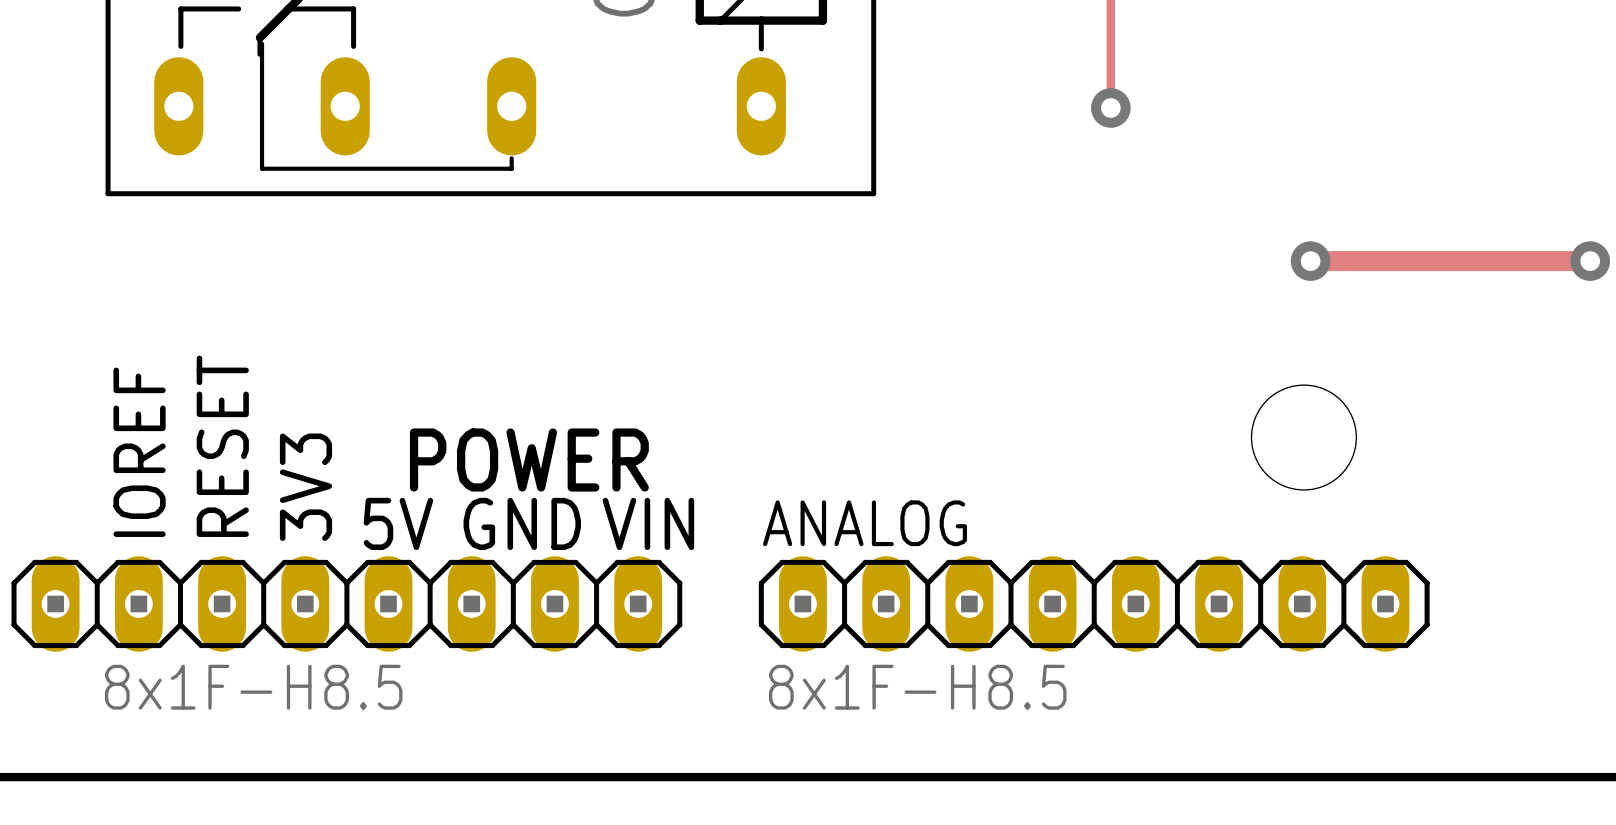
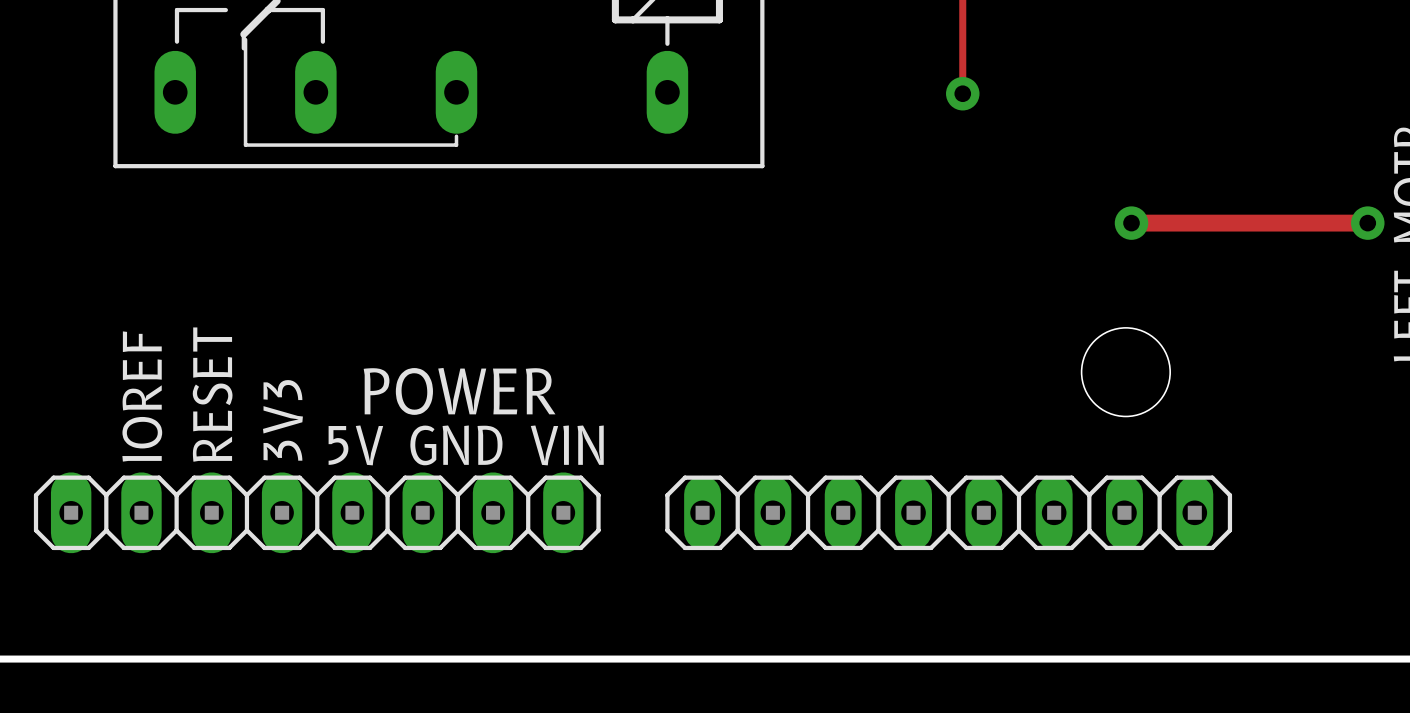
ANALOG: 8x1F-H8.5 (1094, 603) -> none
part: none -> (948, 512)
POWER value: 8x1F-H8.5 (253, 687) -> none

